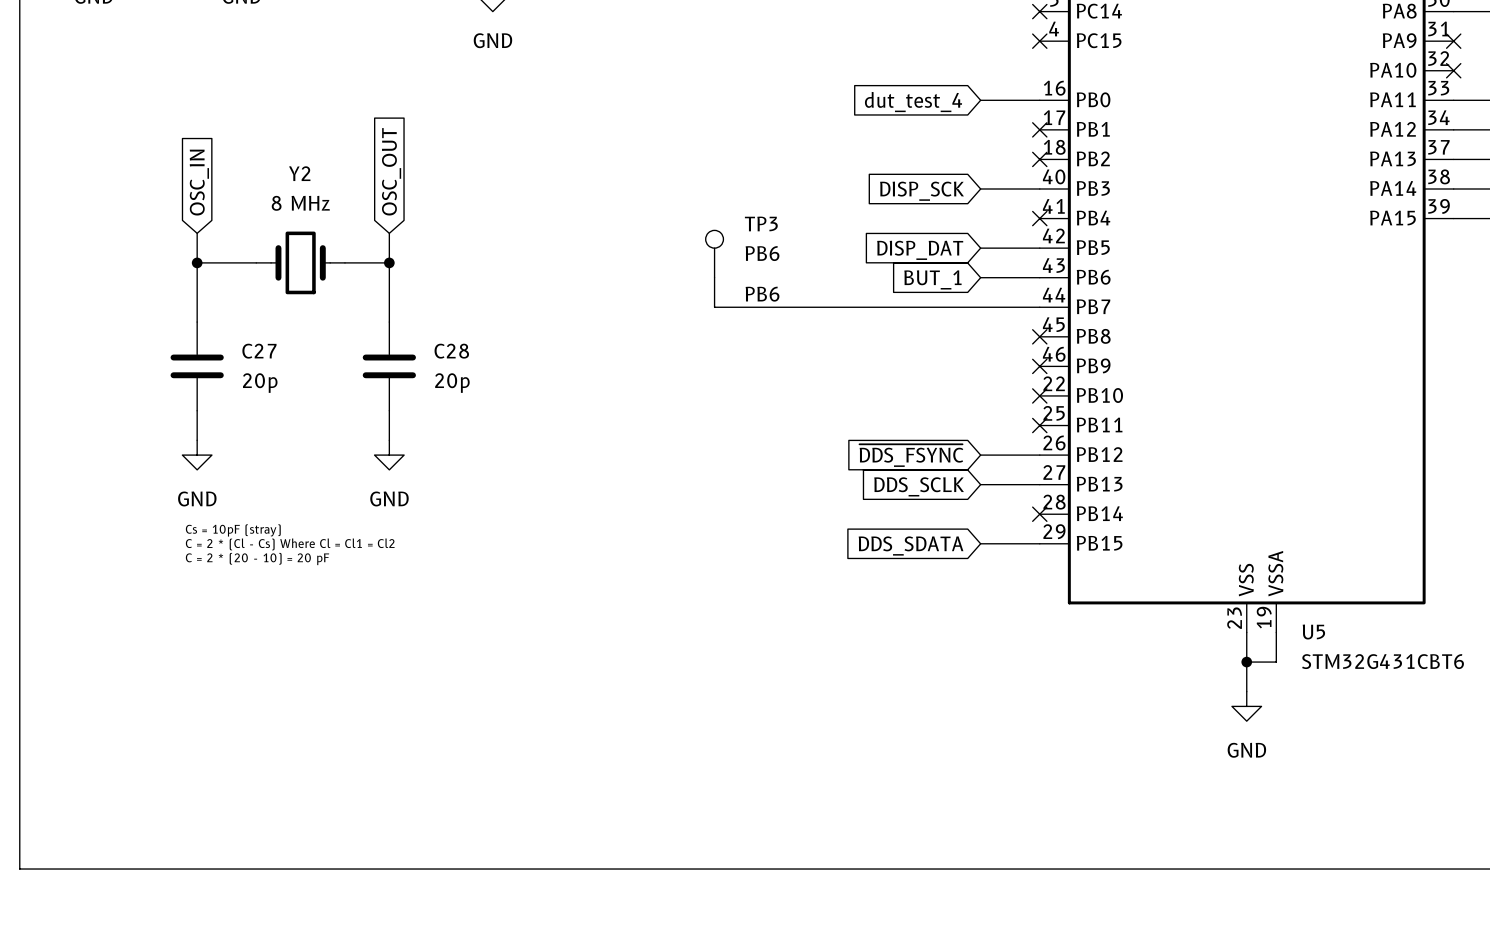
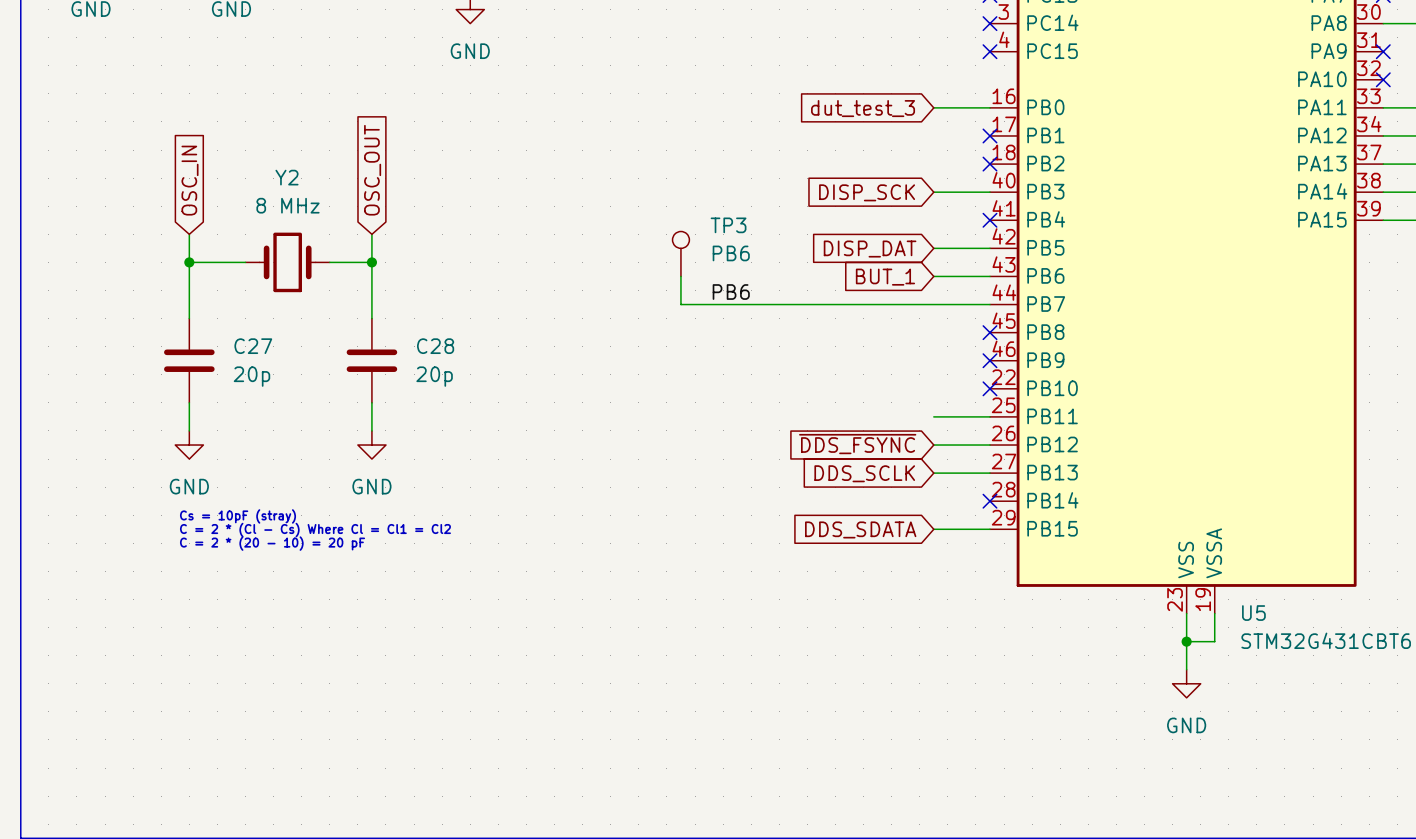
global label: dut_test_4 (913, 102) -> dut_test_3 (863, 108)
wire: none -> (933, 416) (989, 416)
no-connect mark: (1039, 425) -> none

